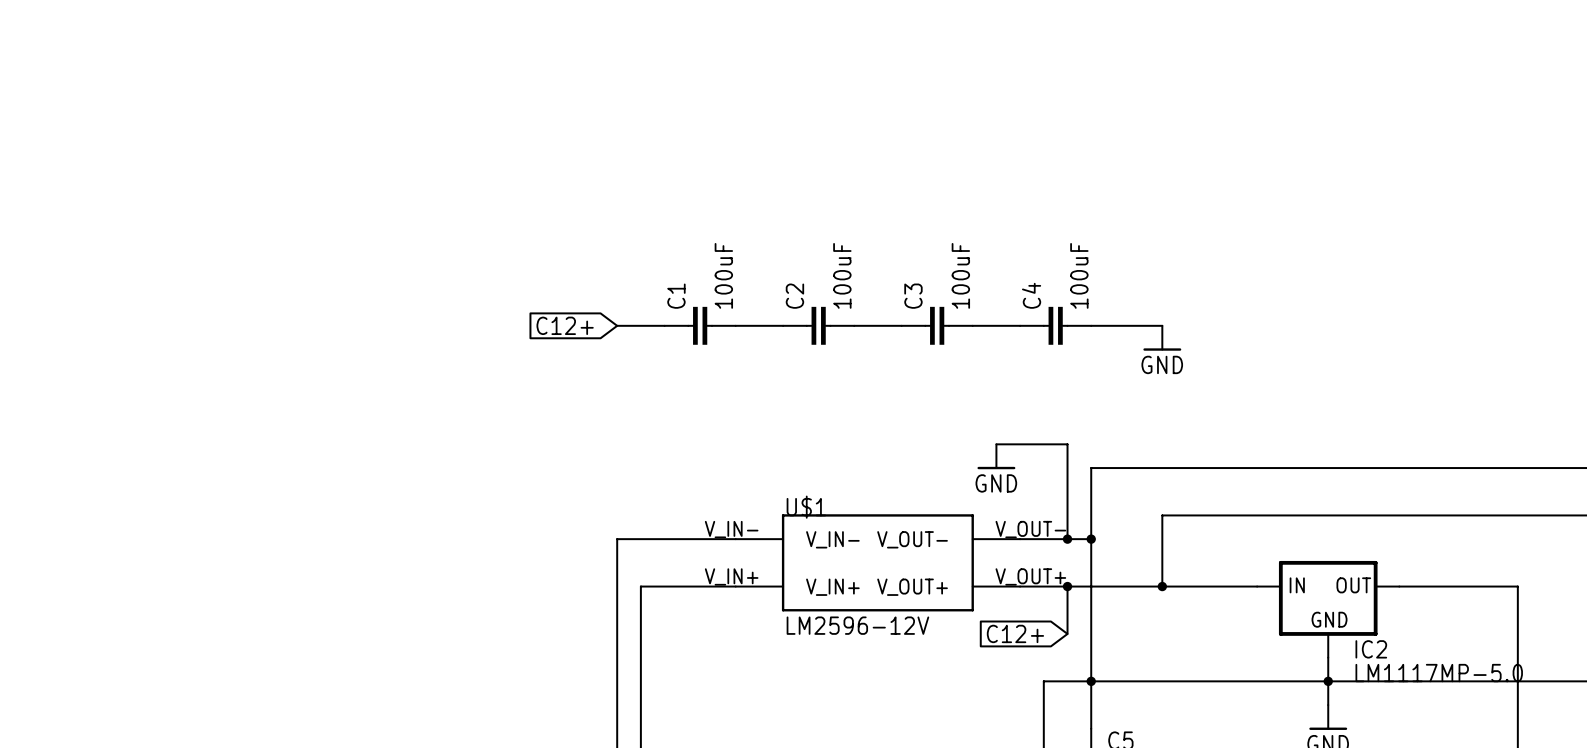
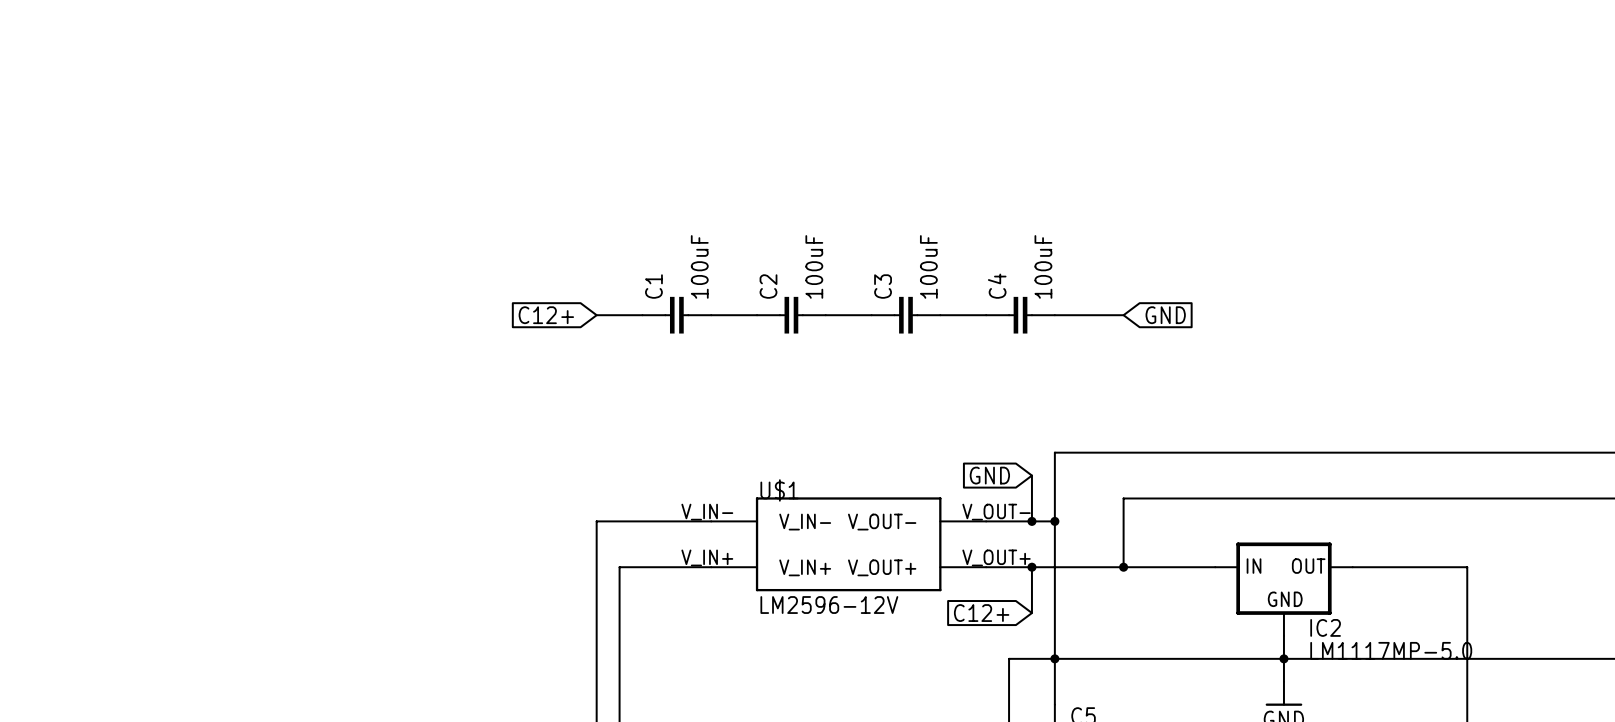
global label: none -> GND (1165, 315)
power symbol: GND (1162, 338) -> none
wire: (996, 444) (1067, 444) (1067, 491) -> none
power symbol: GND (996, 456) -> none
global label: none -> GND (989, 475)

